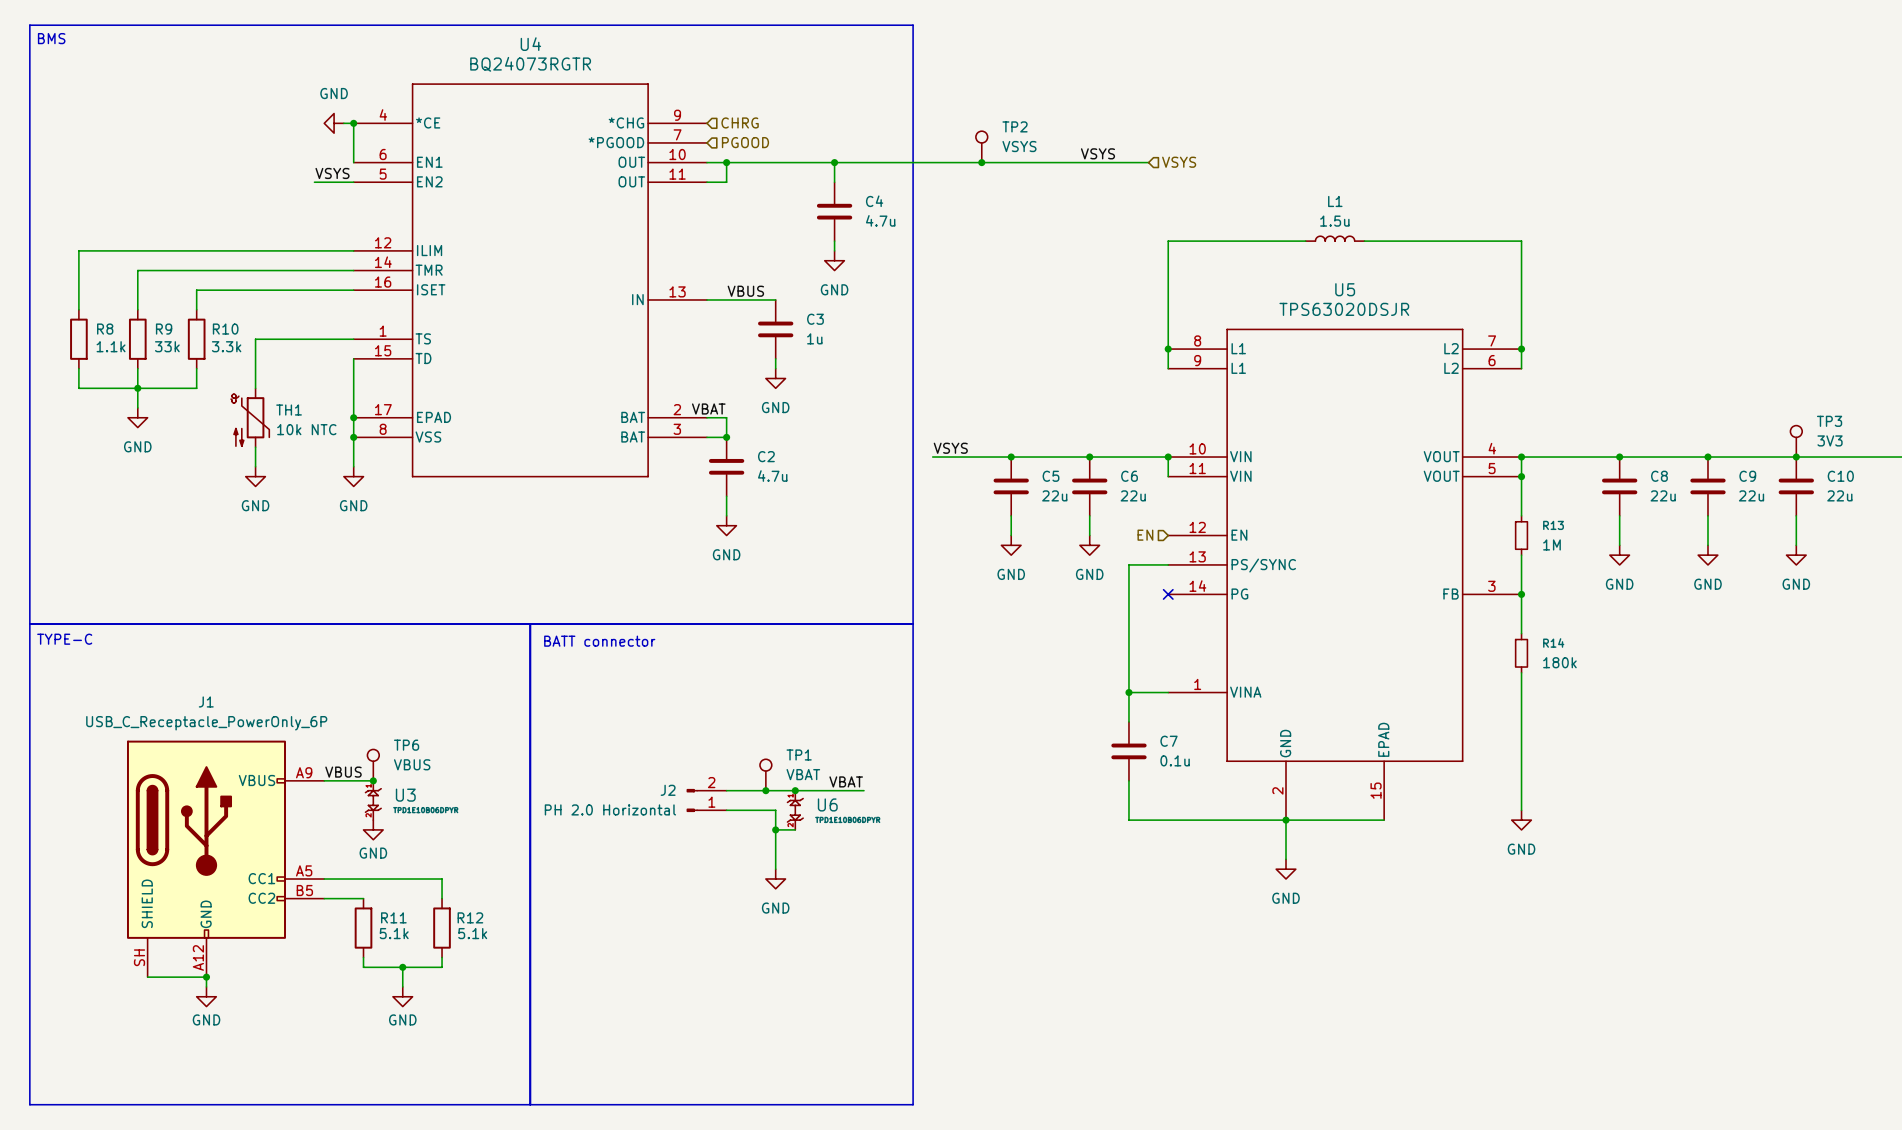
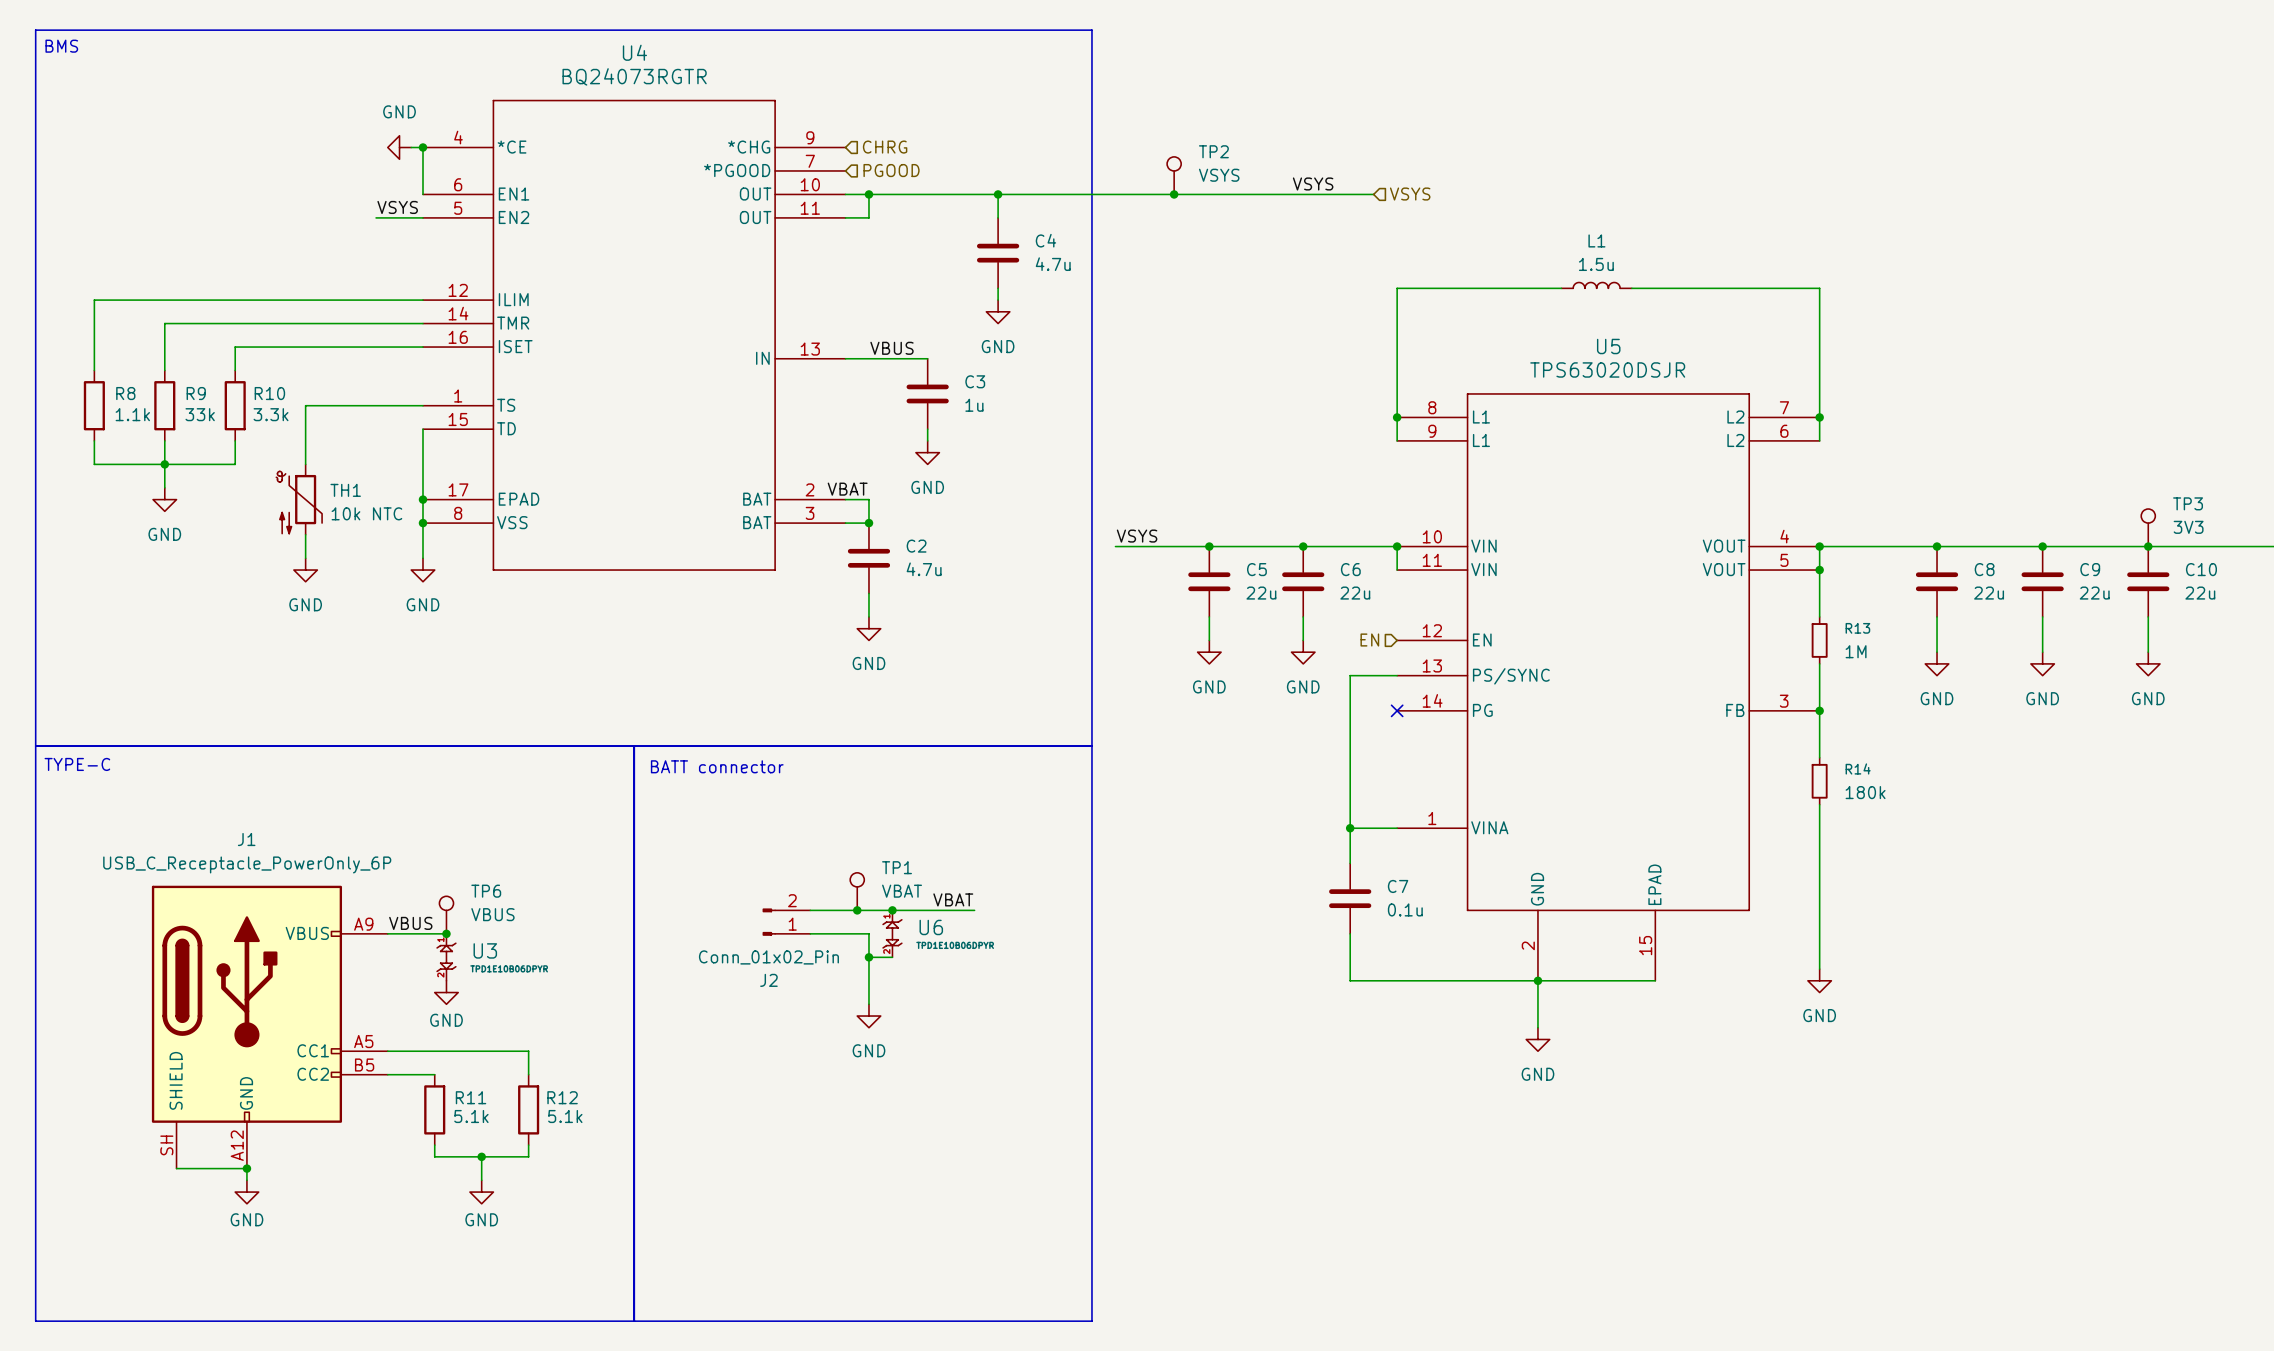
junction: none -> (857, 910)
junction: none -> (892, 910)
TP1 position: (765, 774) -> (857, 891)
label position: VBAT (846, 781) -> VBAT (953, 899)
J2 name position: J2 (668, 790) -> J2 (768, 980)
wire: (726, 790) (864, 790) -> (810, 910) (974, 910)
junction: (765, 790) -> none
junction: (795, 790) -> none
J2 position: (706, 800) -> (786, 922)
junction: none -> (868, 957)
J2 value: PH 2.0 Horizontal (610, 809) -> Conn_01x02_Pin (768, 957)
wire: (726, 810) (775, 810) (775, 869) -> (810, 933) (868, 933) (868, 1004)
U6 position: (795, 810) -> (892, 933)
wire: (775, 829) (795, 829) -> (868, 957) (892, 957)
junction: (775, 829) -> none
power symbol position: GND (775, 879) -> GND (868, 1016)

